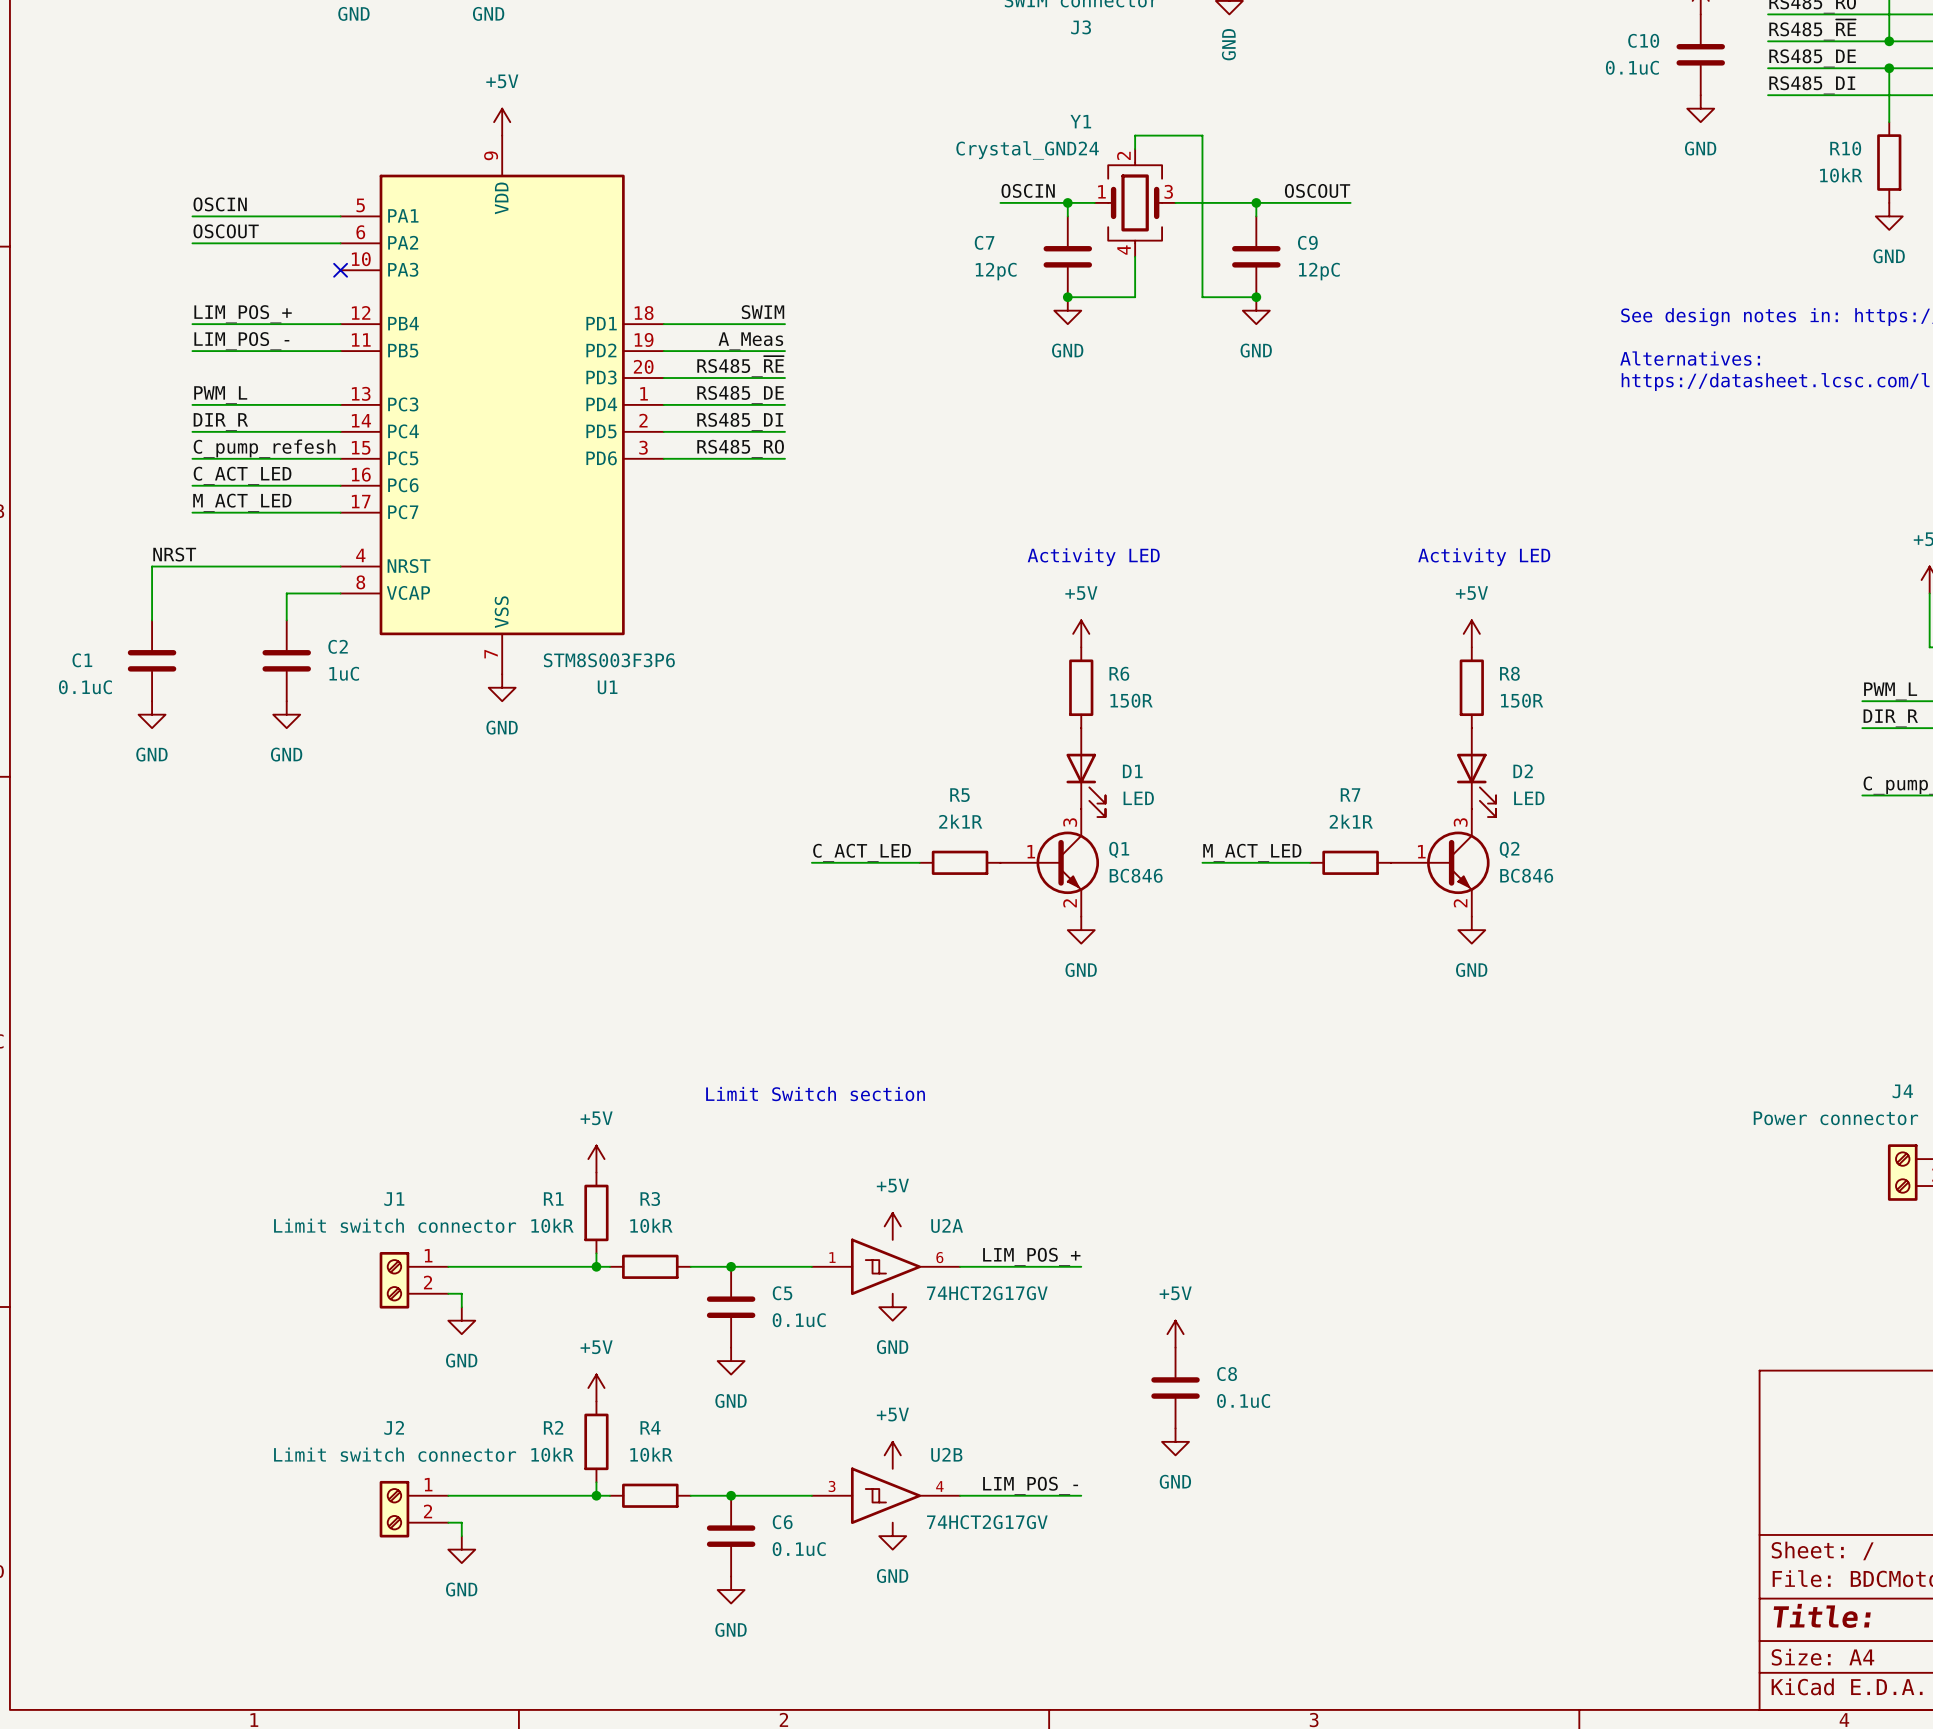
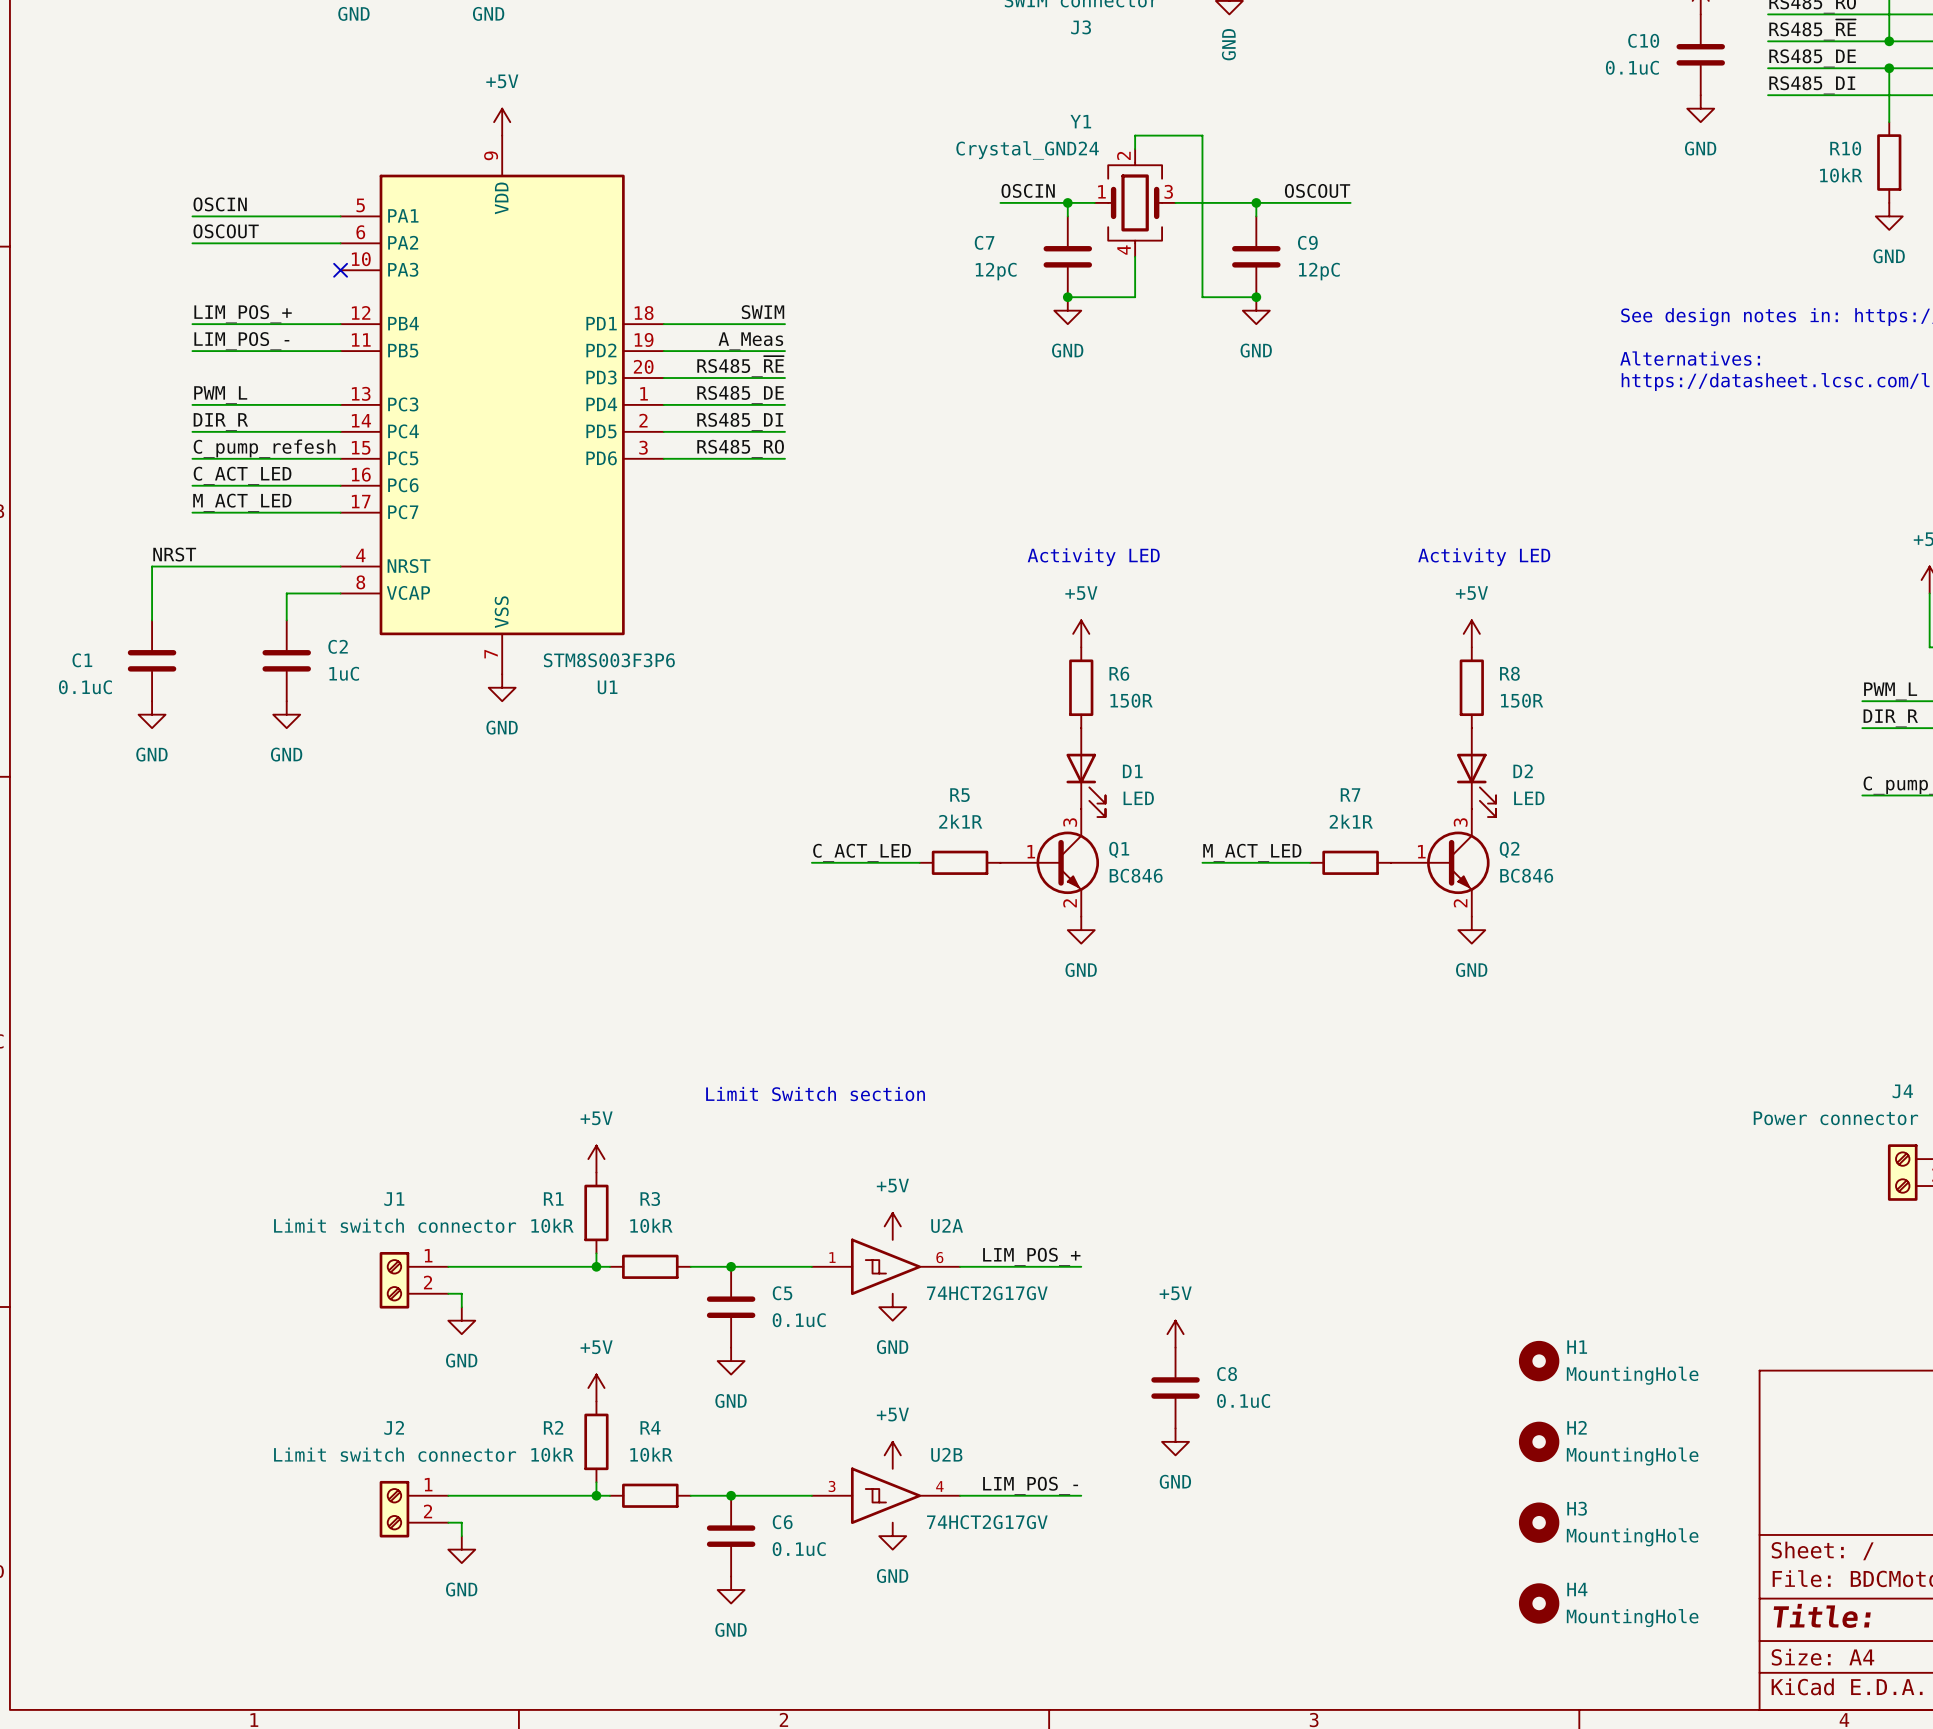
H1: none -> MountingHole (1539, 1361)
H2: none -> MountingHole (1539, 1441)
H3: none -> MountingHole (1539, 1522)
H4: none -> MountingHole (1539, 1603)

